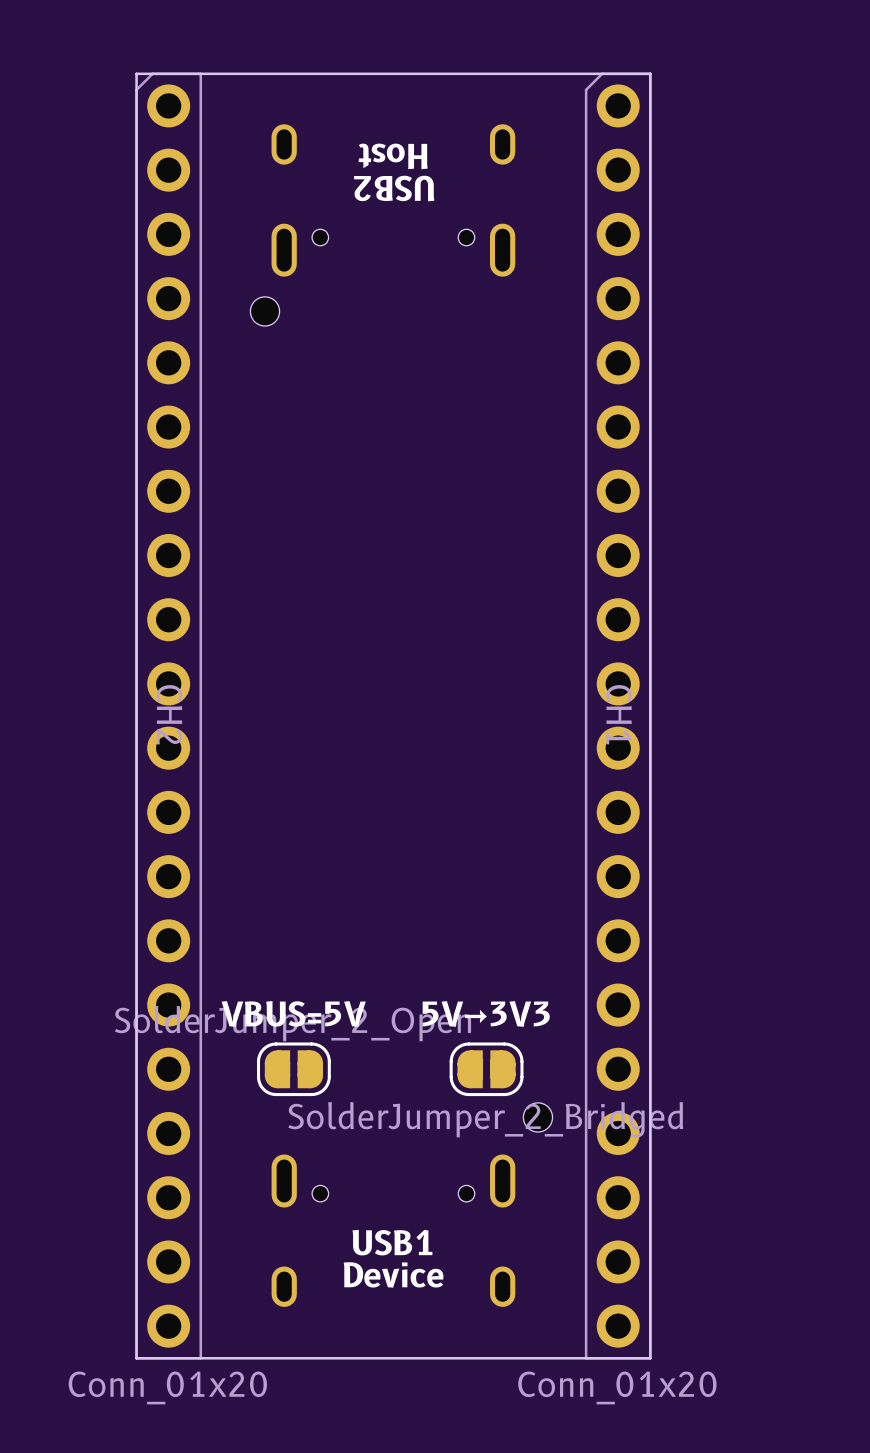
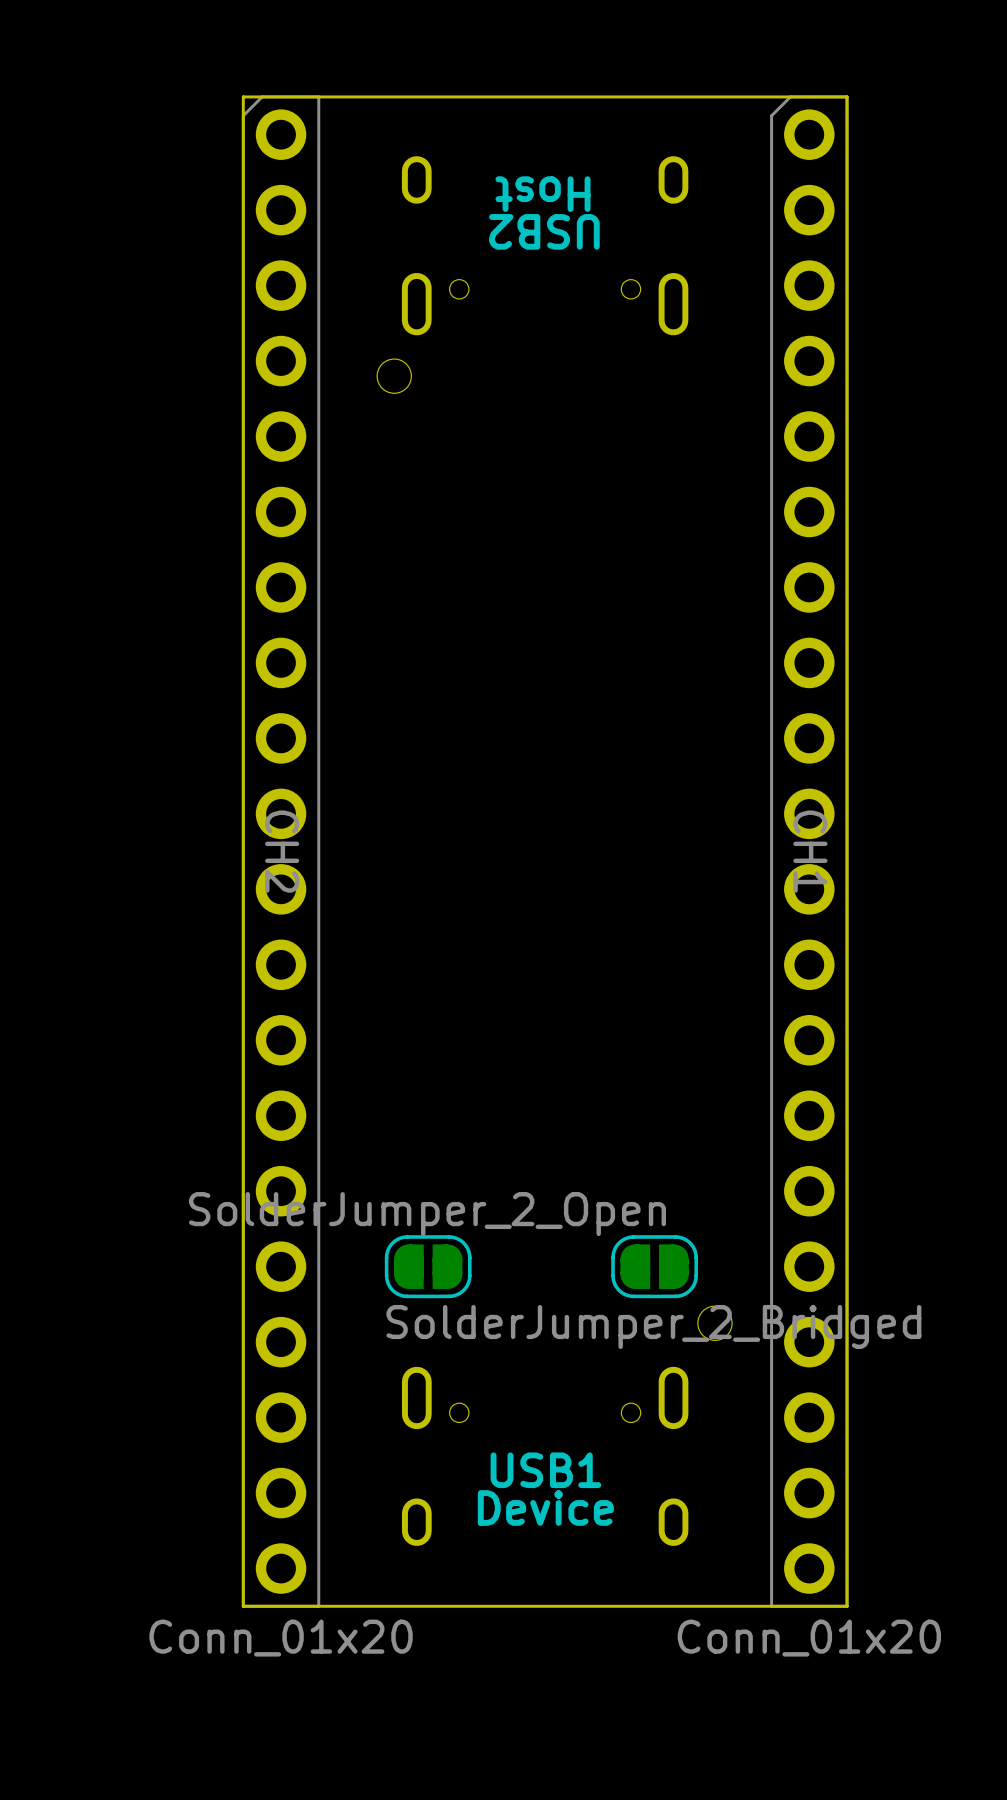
part text: VBUS=5V (293, 1013) -> none
part text: 5V→3V3 (486, 1013) -> none

